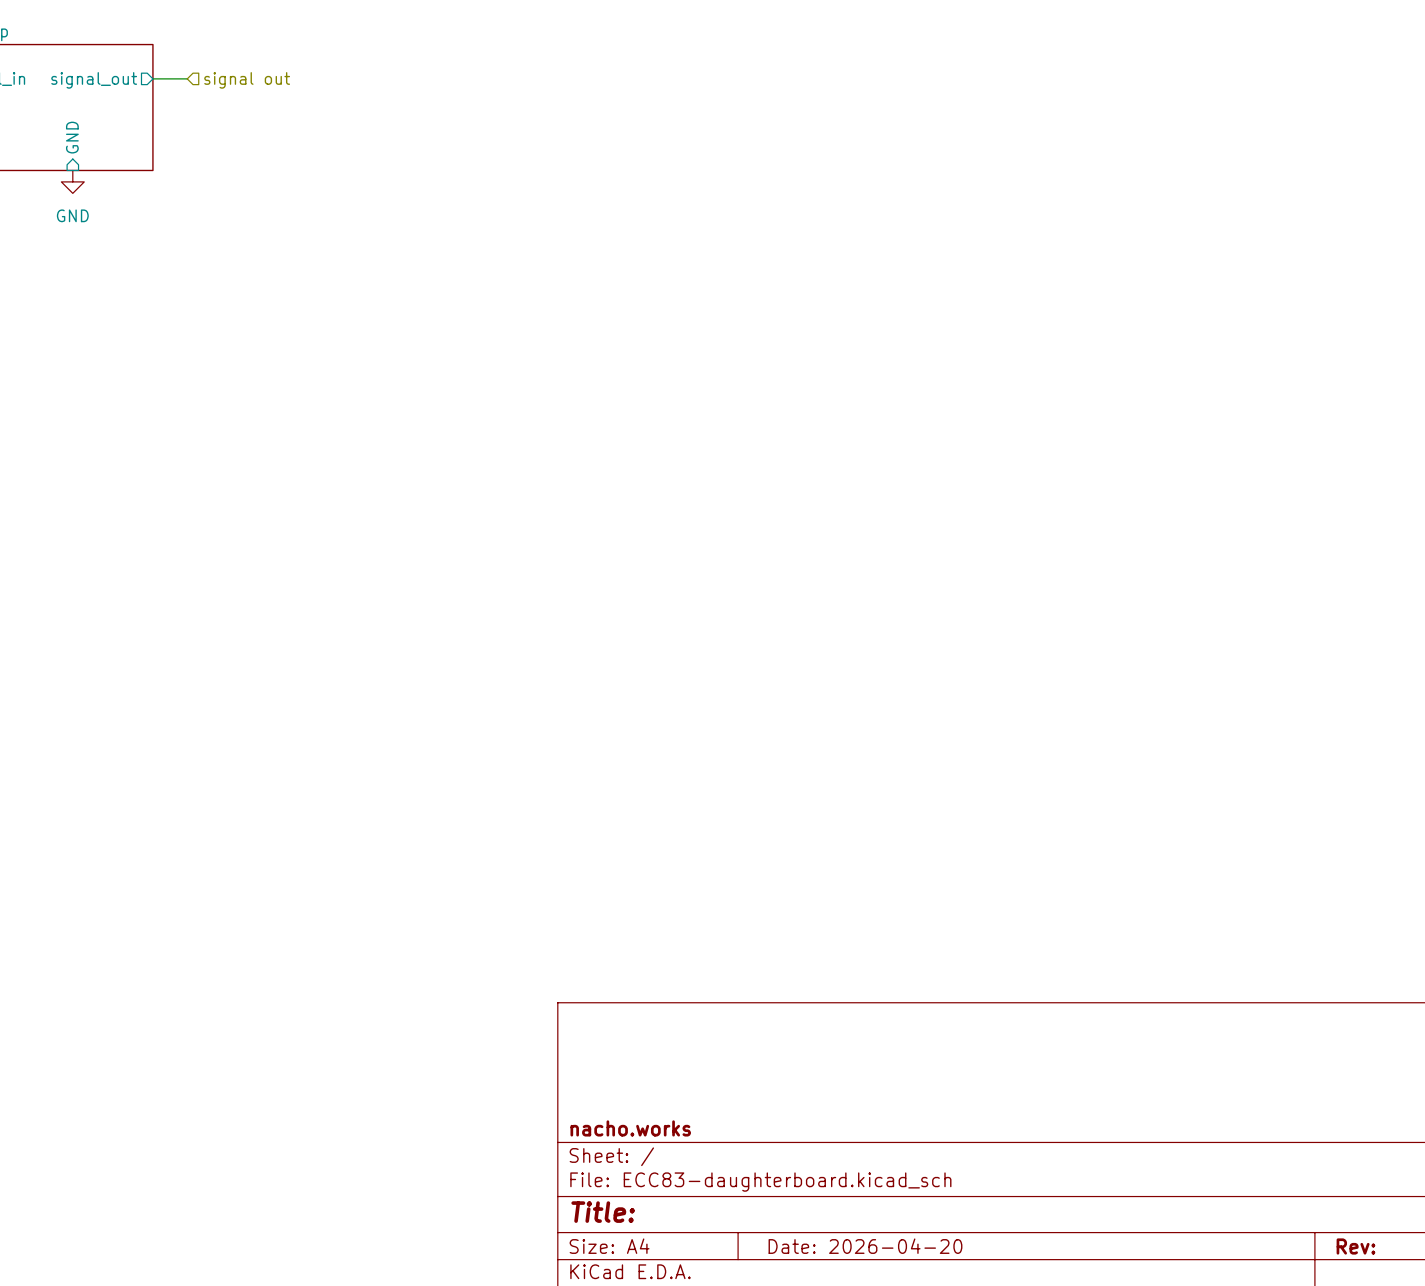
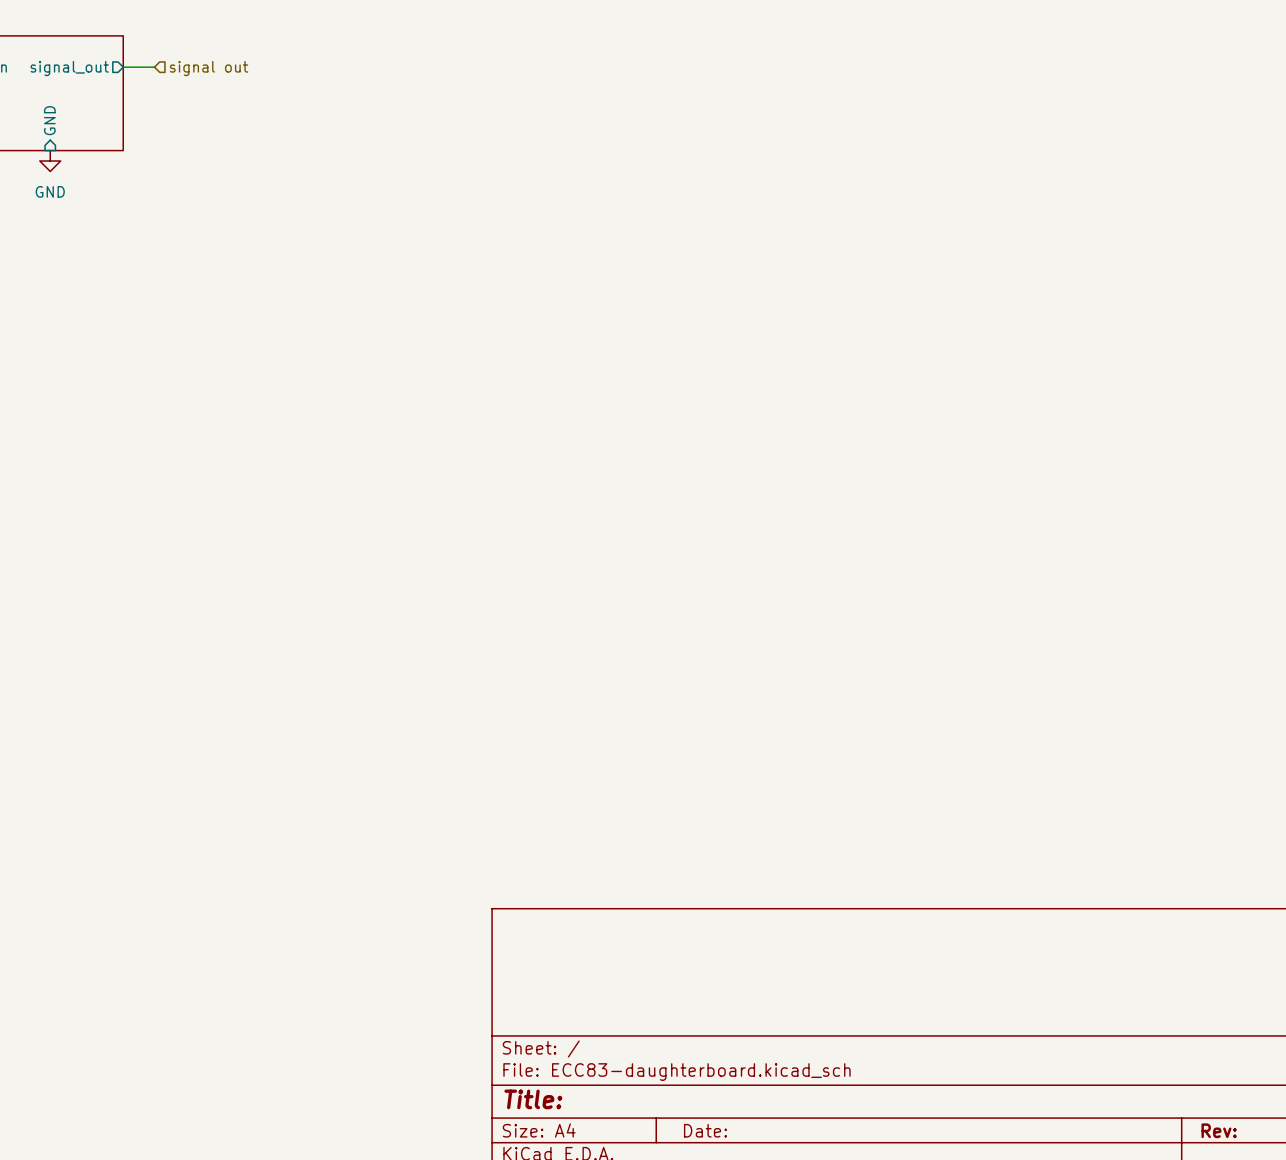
title block: nacho.works (630, 1128) -> none
title block: Date: 2026-04-20 (865, 1246) -> Date: (705, 1130)

